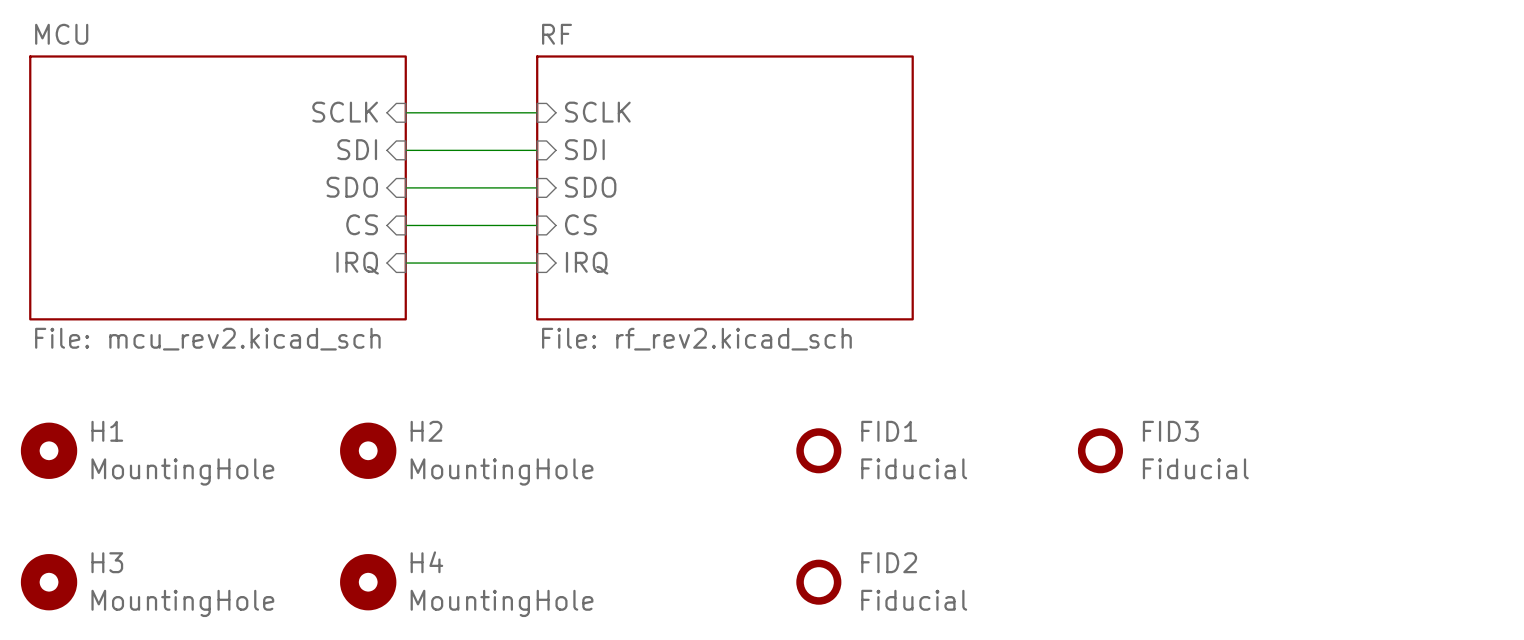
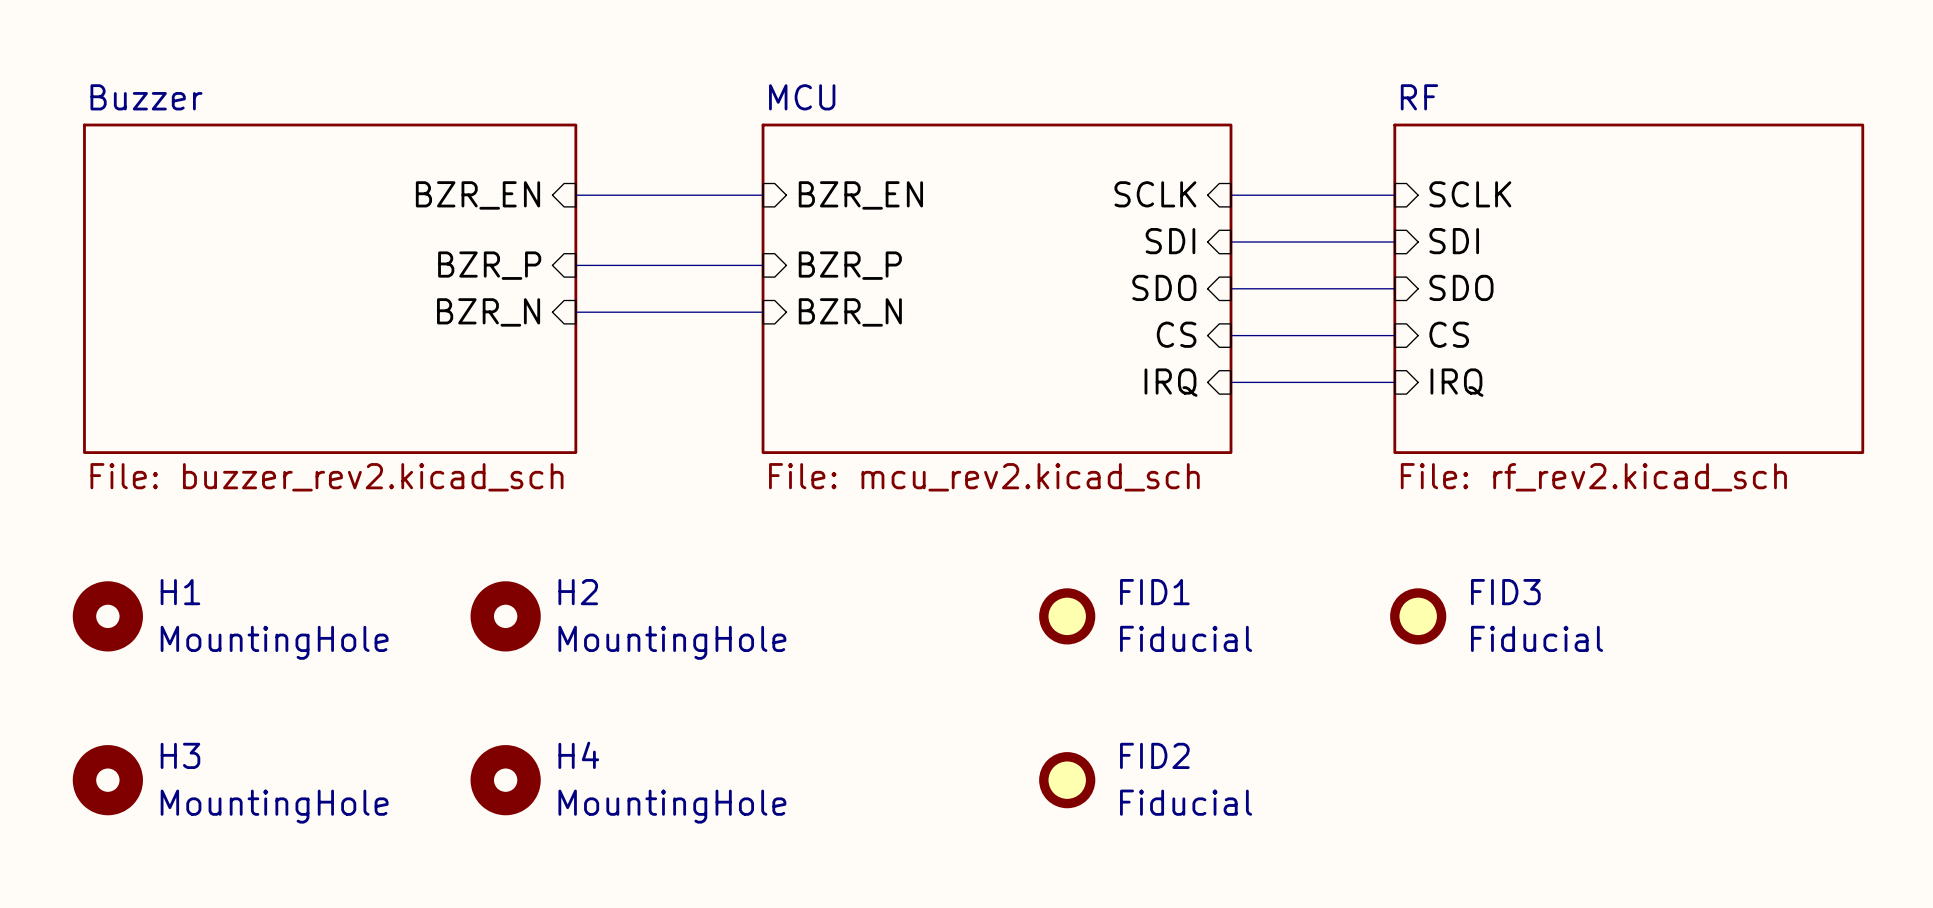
sheet pin: SCLK (345, 112) -> none
wire: (405, 112) (424, 112) -> none
wire: none -> (716, 195) (763, 195)
sheet pin: SCLK (597, 112) -> none
sheet pin: none -> SCLK (1155, 194)
wire: none -> (1231, 195) (1394, 195)
sheet pin: none -> SCLK (1470, 194)
sheet pin: none -> BZR_EN (477, 195)
sheet pin: none -> BZR_EN (860, 195)
sheet pin: SDI (357, 149) -> none
sheet pin: SDI (584, 149) -> none
sheet pin: none -> SDI (1170, 241)
sheet pin: none -> SDI (1454, 241)
wire: (405, 150) (537, 150) -> none
wire: none -> (1231, 242) (1394, 242)
sheet pin: none -> BZR_P (489, 265)
wire: none -> (575, 265) (763, 265)
sheet pin: none -> BZR_P (850, 265)
sheet MCU: File: mcu_rev2.kicad_sch (218, 187) -> none
sheet Buzzer: none -> File: buzzer_rev2.kicad_sch (330, 288)
sheet pin: SDO (352, 187) -> none
wire: (405, 187) (537, 187) -> none
sheet pin: SDO (590, 187) -> none
sheet RF: File: rf_rev2.kicad_sch (724, 187) -> none
sheet MCU: none -> File: mcu_rev2.kicad_sch (997, 288)
sheet pin: none -> SDO (1164, 287)
wire: none -> (1231, 288) (1394, 288)
sheet pin: none -> SDO (1461, 287)
sheet RF: none -> File: rf_rev2.kicad_sch (1628, 288)
sheet pin: none -> BZR_N (488, 312)
wire: none -> (575, 312) (763, 312)
sheet pin: none -> BZR_N (850, 312)
sheet pin: CS (362, 224) -> none
sheet pin: CS (580, 224) -> none
sheet pin: none -> CS (1176, 334)
sheet pin: none -> CS (1449, 334)
wire: (405, 225) (537, 225) -> none
wire: none -> (1231, 335) (1394, 335)
sheet pin: IRQ (357, 263) -> none
wire: (405, 263) (537, 263) -> none
sheet pin: IRQ (587, 263) -> none
sheet pin: none -> IRQ (1171, 382)
wire: none -> (1231, 382) (1394, 382)
sheet pin: none -> IRQ (1457, 382)

